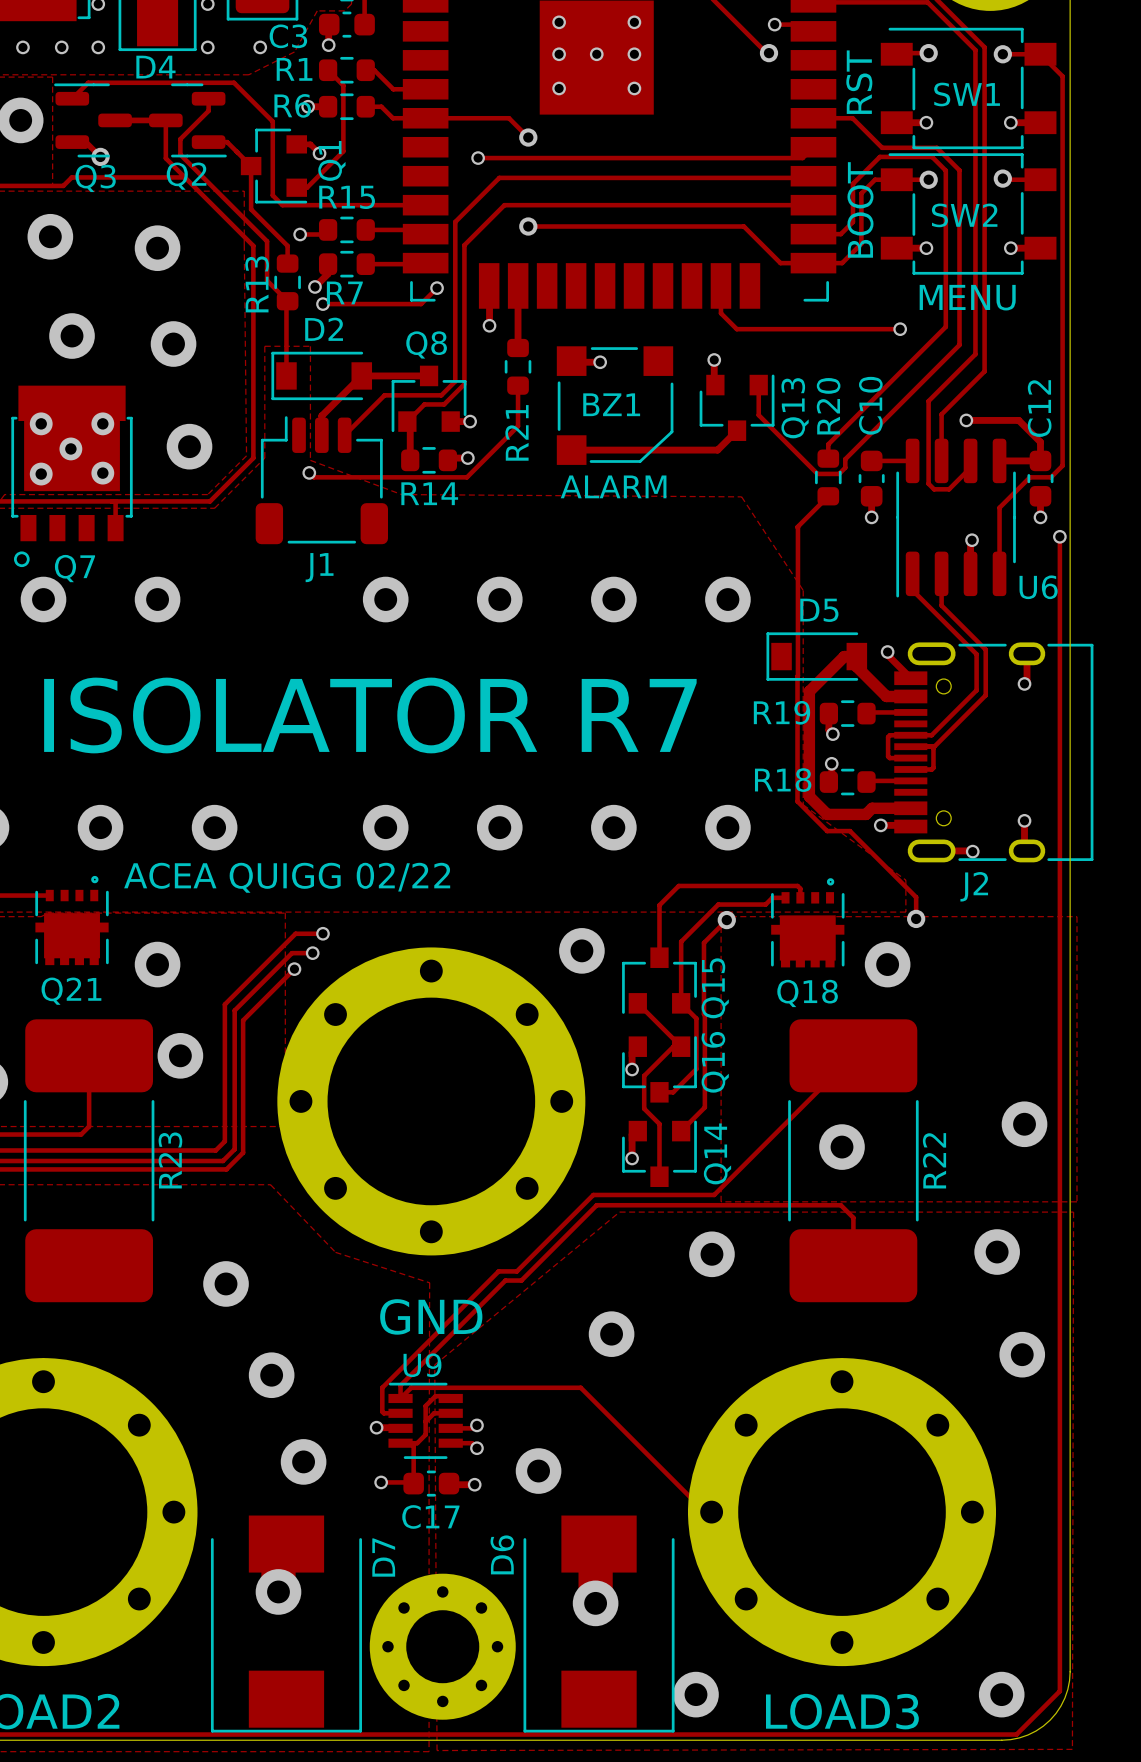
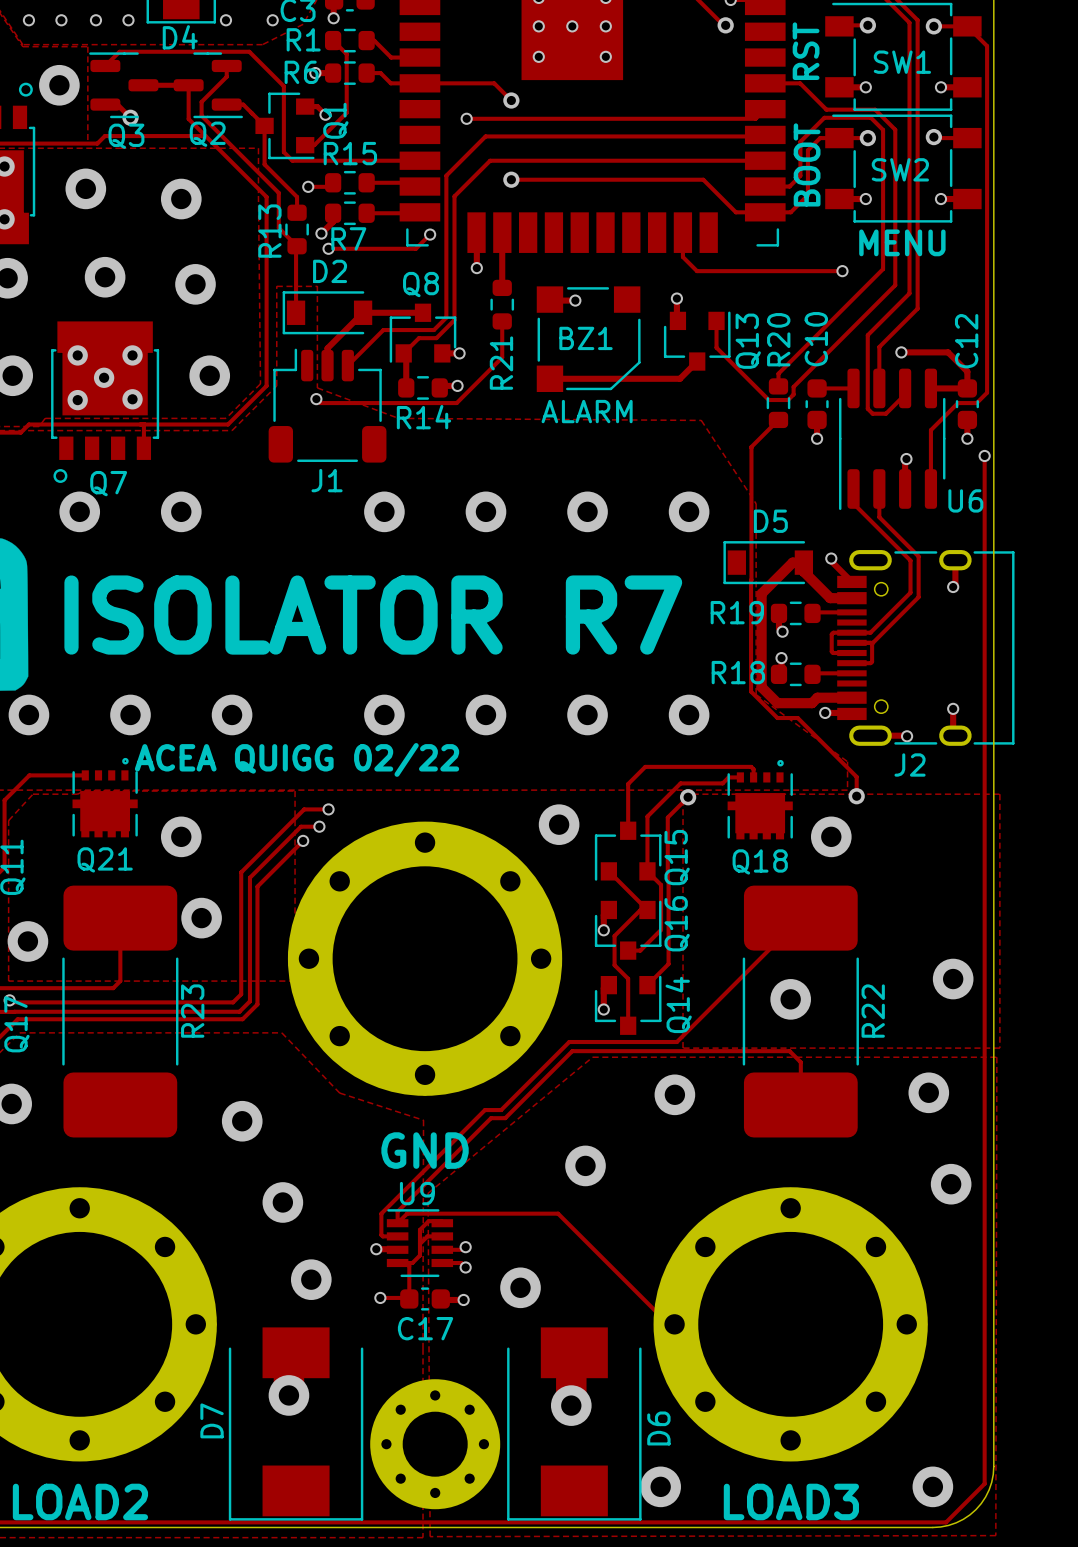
D6 name position: D6 (502, 1554) -> D6 (658, 1428)
D7 name position: D7 (383, 1557) -> D7 (212, 1420)

